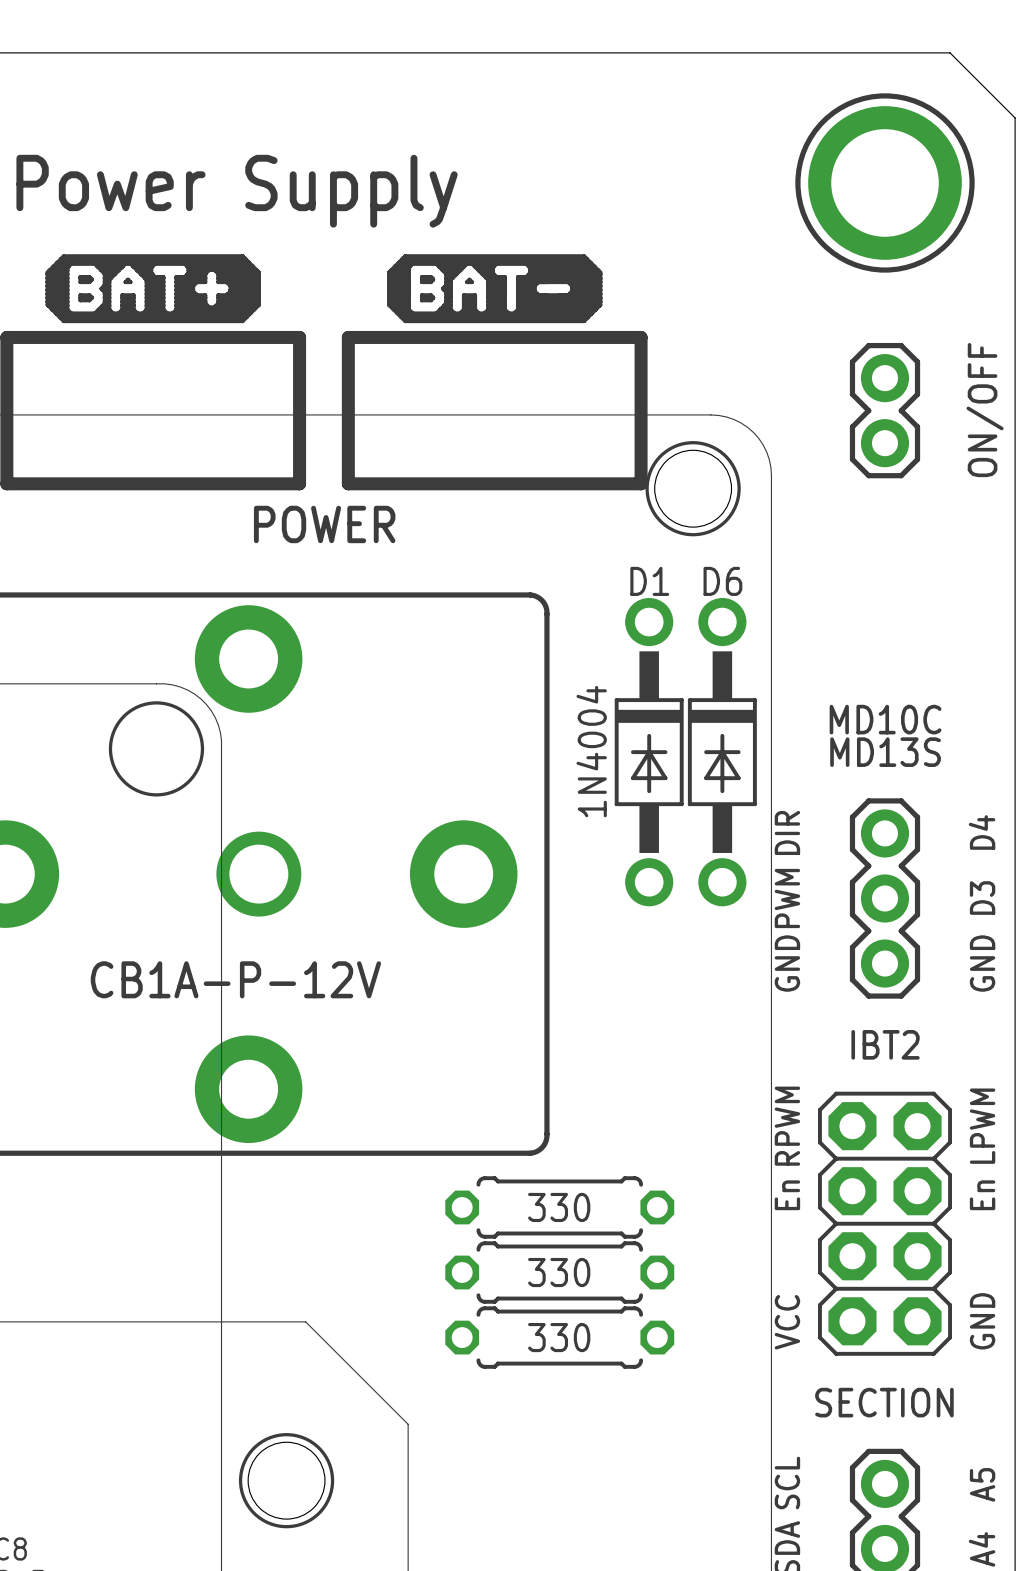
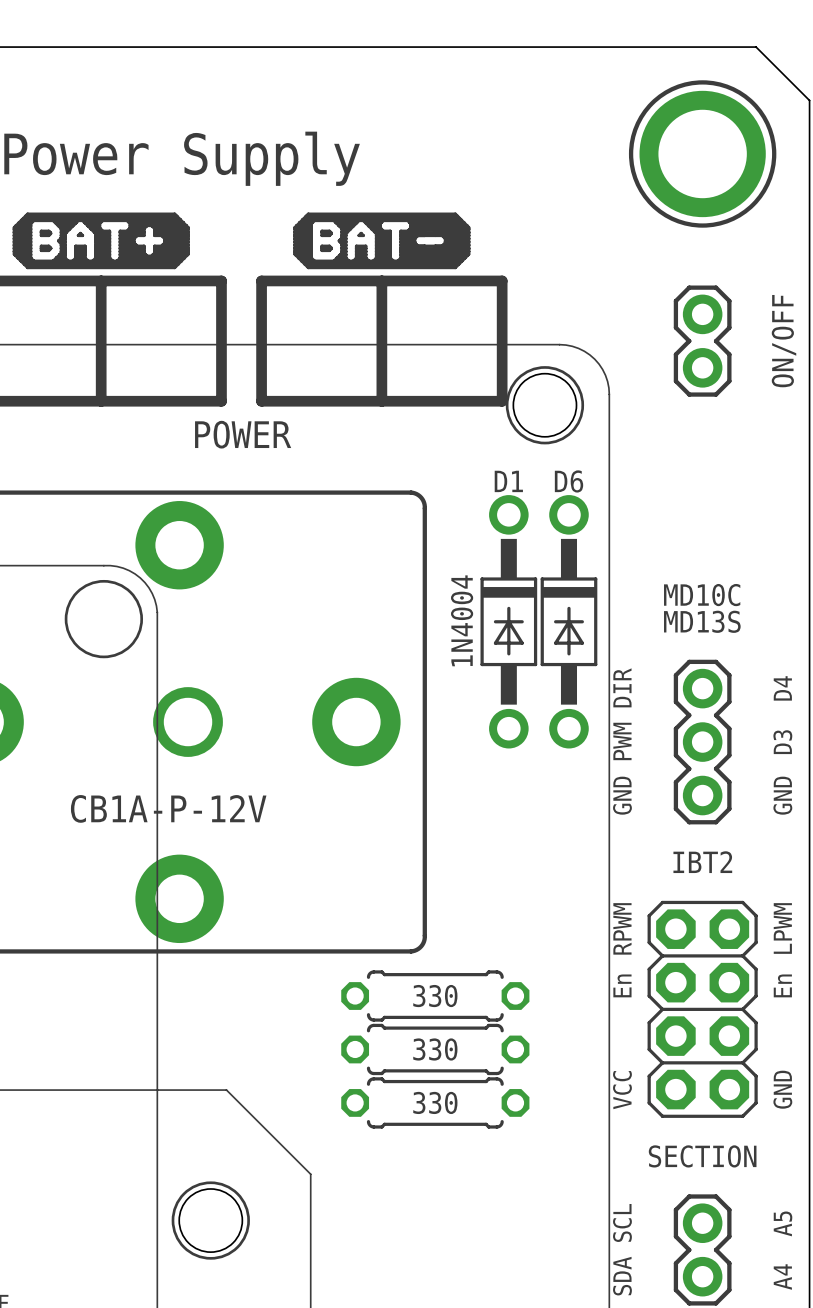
line: none -> (101, 280) (101, 401)
line: none -> (381, 280) (381, 401)

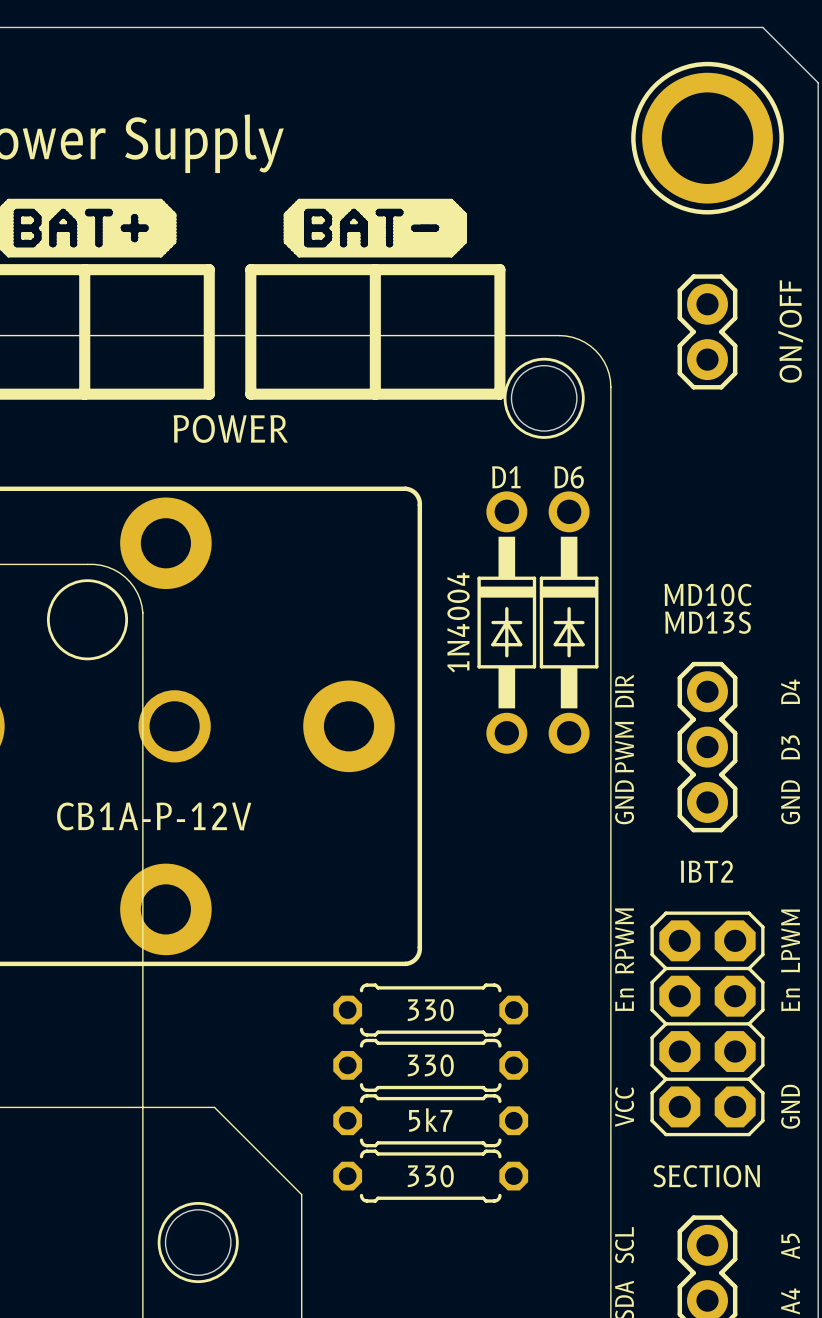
part value: 330 (435, 1102) -> 5k7 (430, 1120)
part: none -> 330 (430, 1176)

